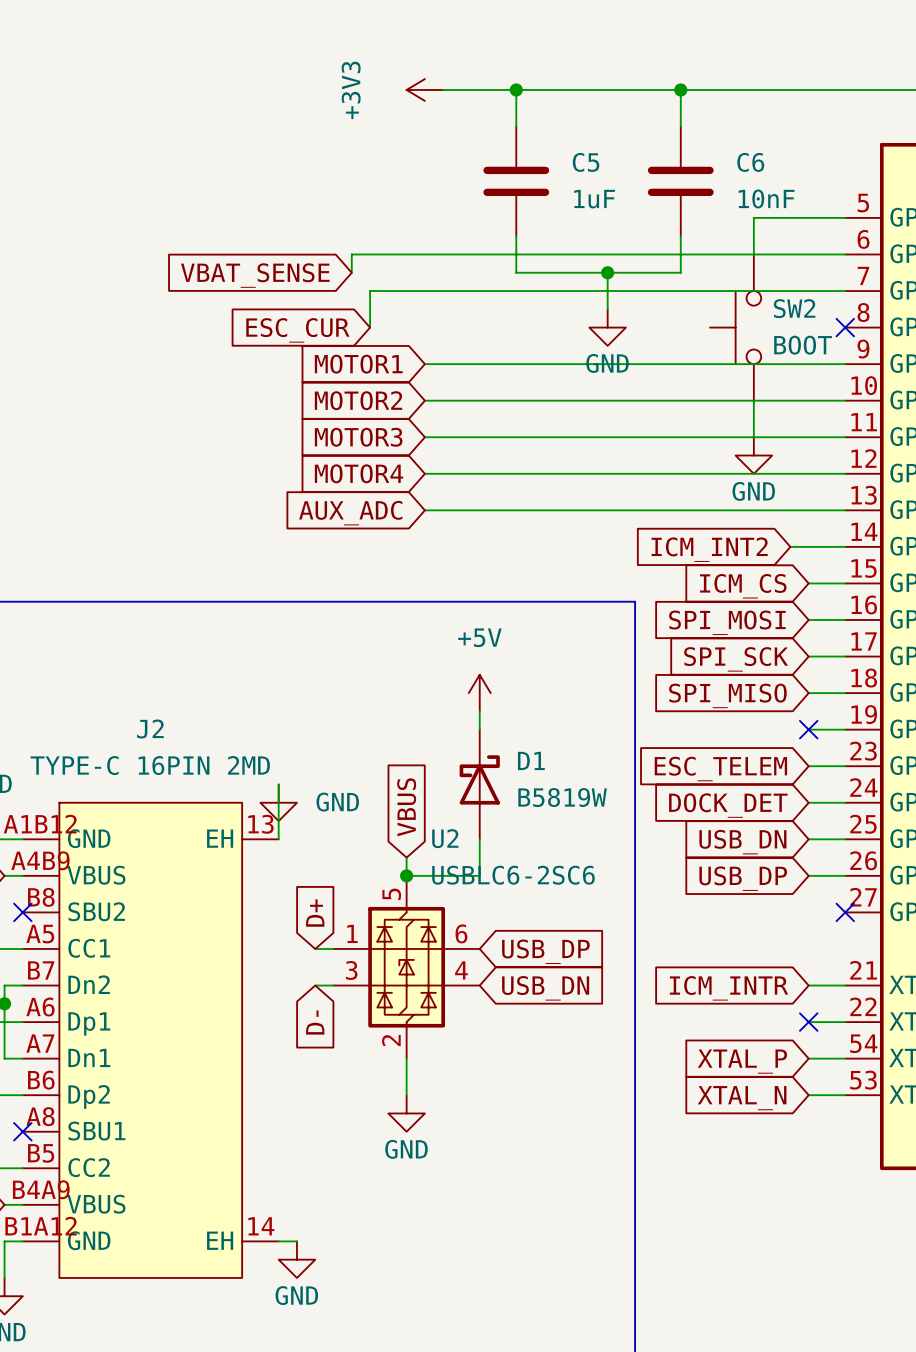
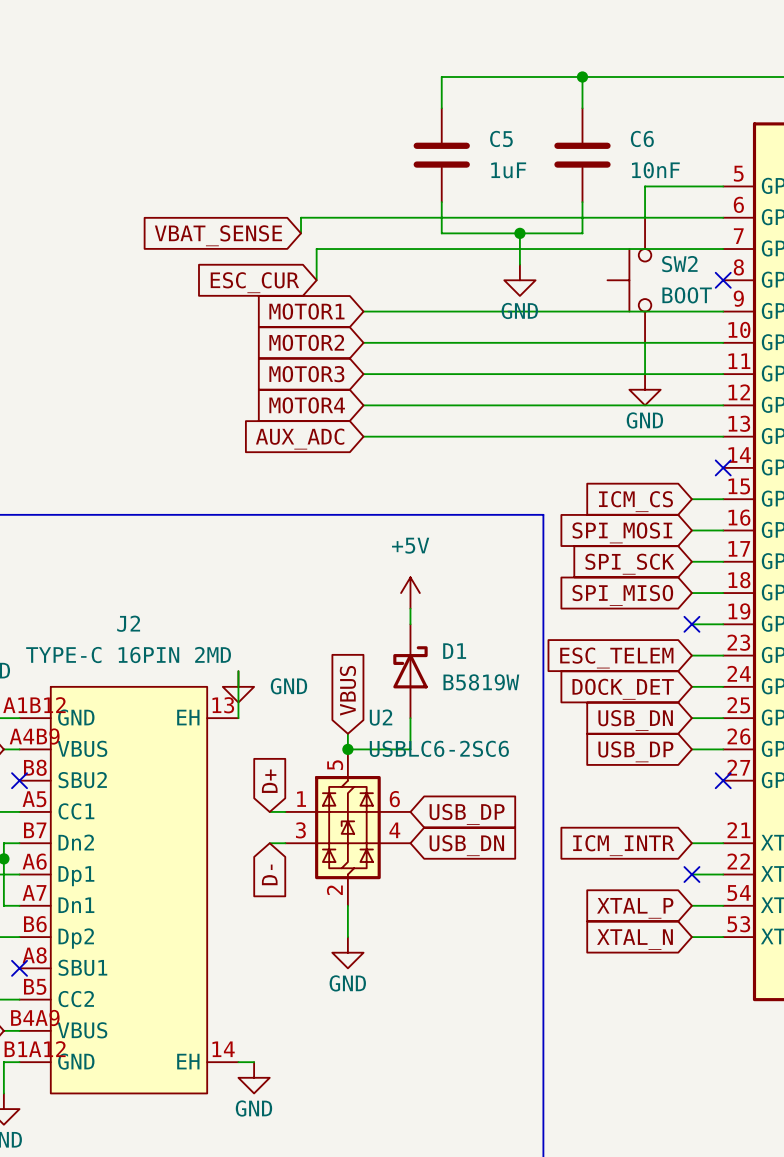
power symbol: +3V3 (424, 89) -> none
wire: (443, 89) (516, 89) -> none
junction: (516, 89) -> none
wire: (790, 546) (845, 546) -> none
no-connect mark: none -> (723, 467)
global label: ICM_INT2 (709, 549) -> none

